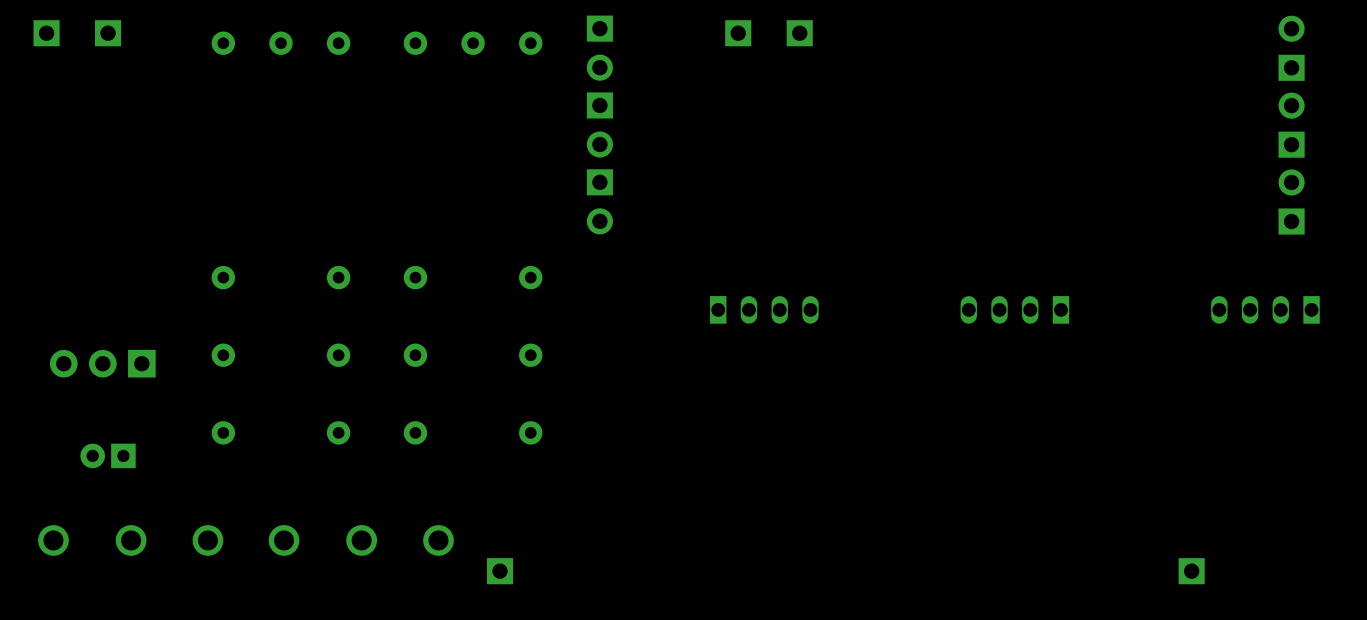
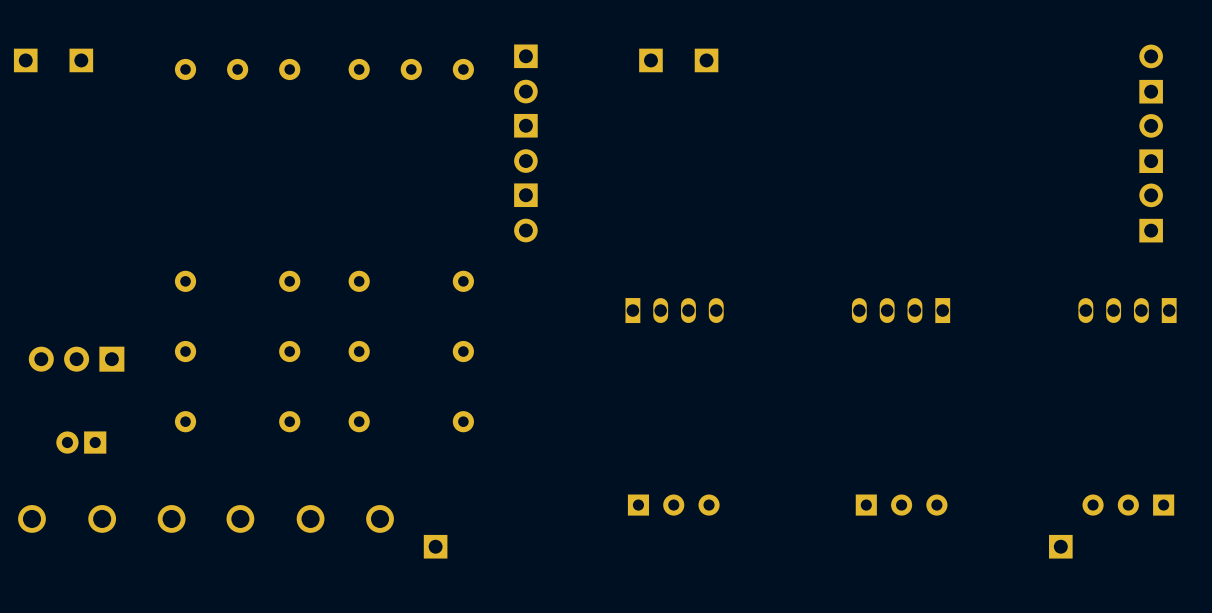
part: none -> (673, 505)
part: none -> (901, 505)
part: none -> (1128, 505)

